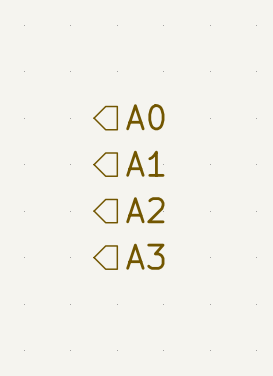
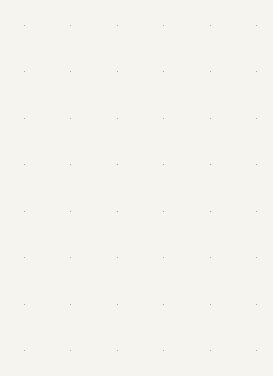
hierarchical label: A0 (145, 117) -> none
hierarchical label: A1 (145, 163) -> none
hierarchical label: A2 (145, 210) -> none
hierarchical label: A3 (145, 256) -> none

